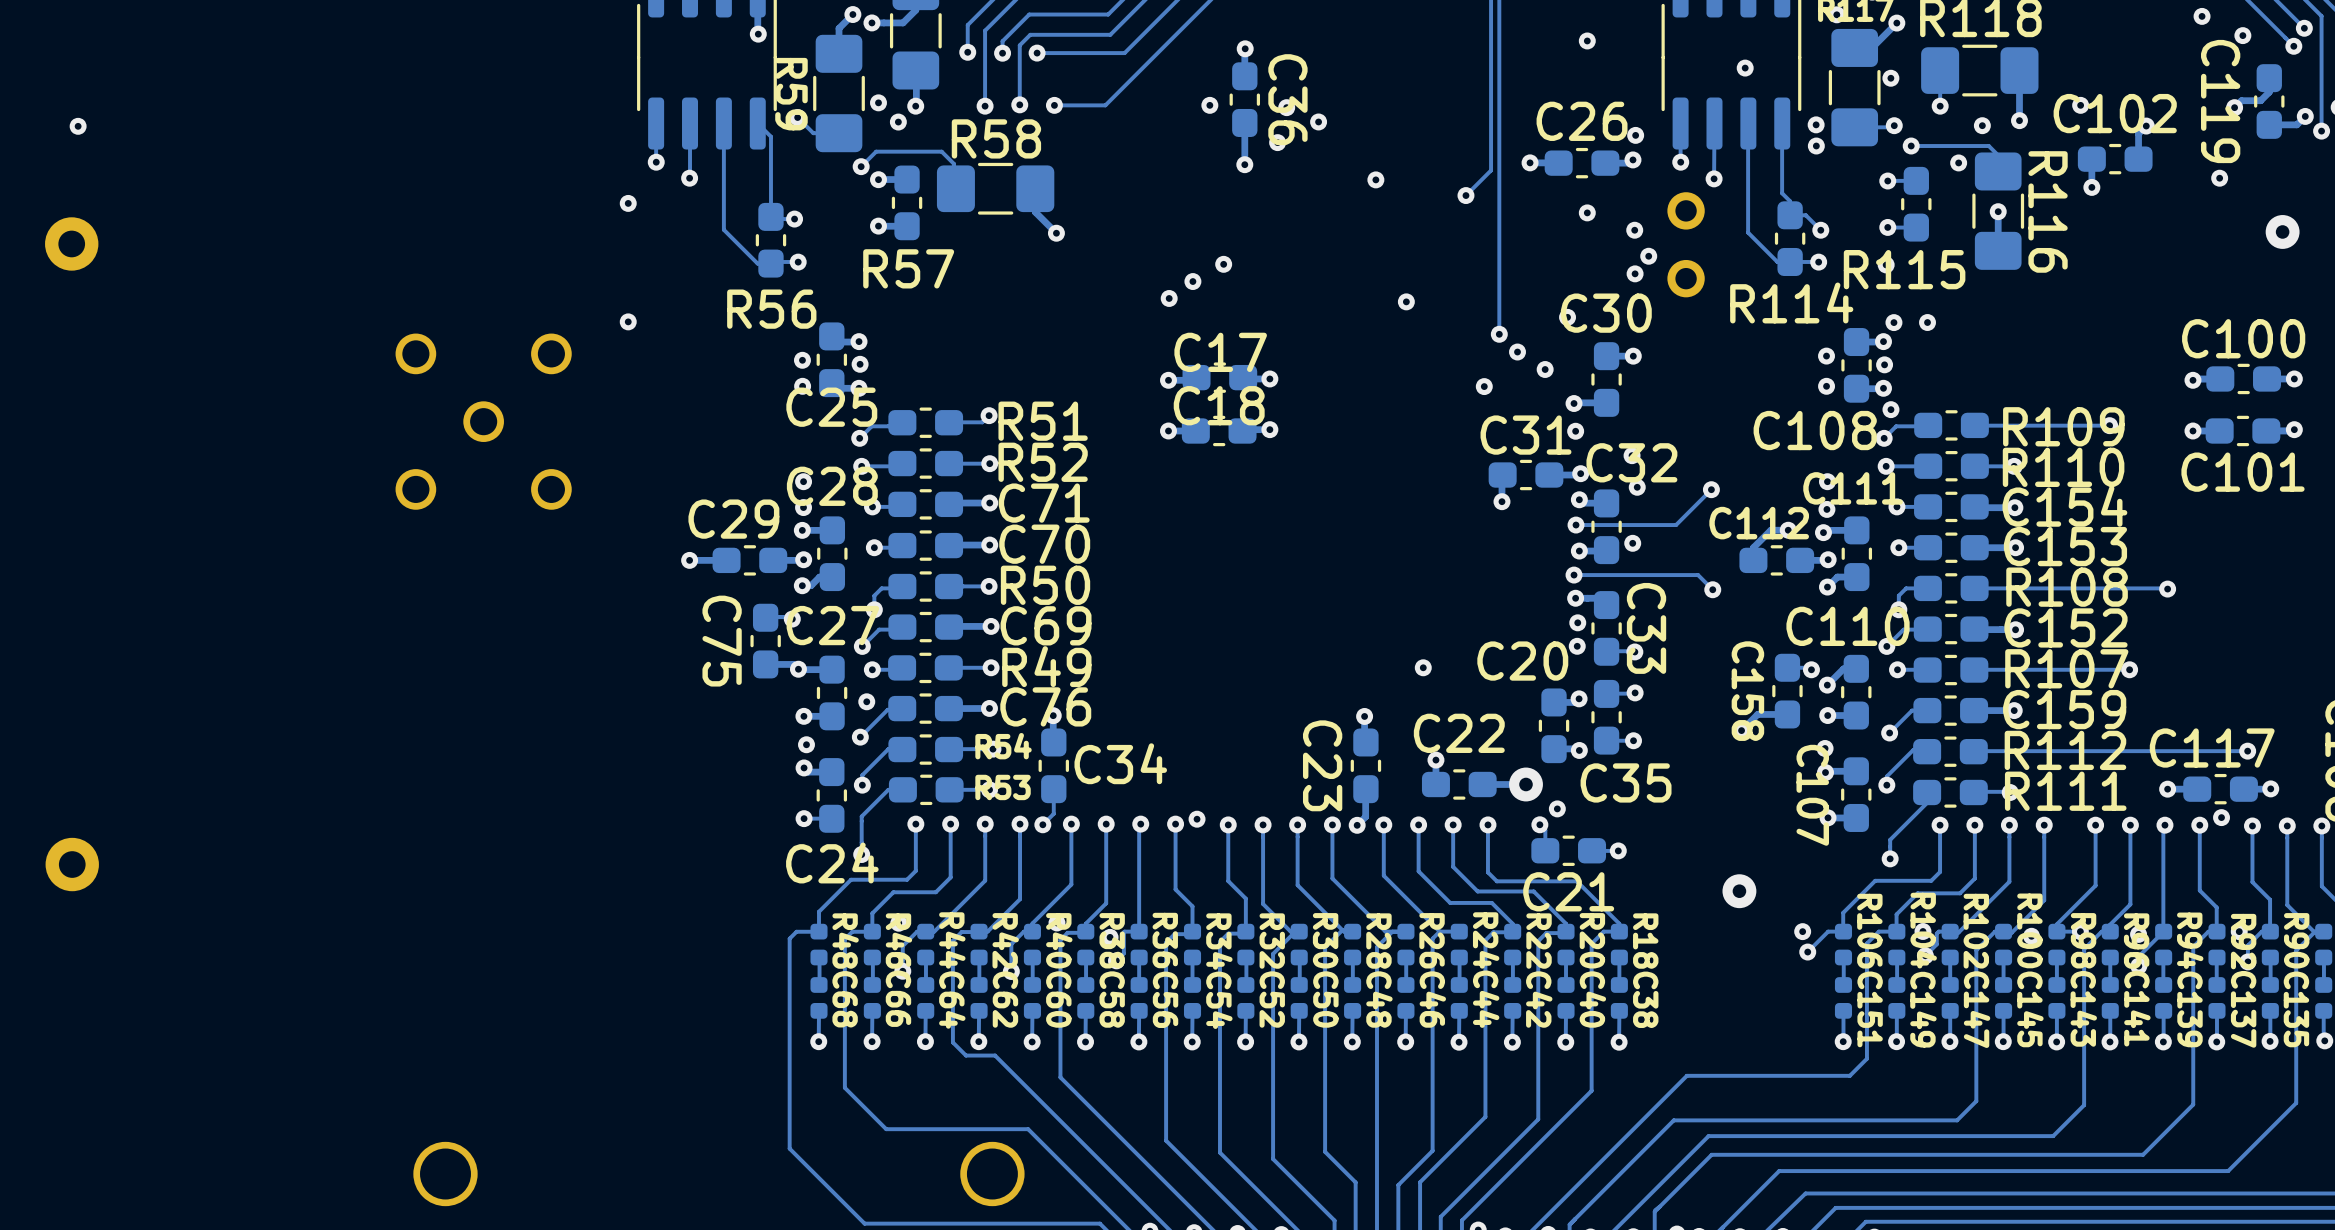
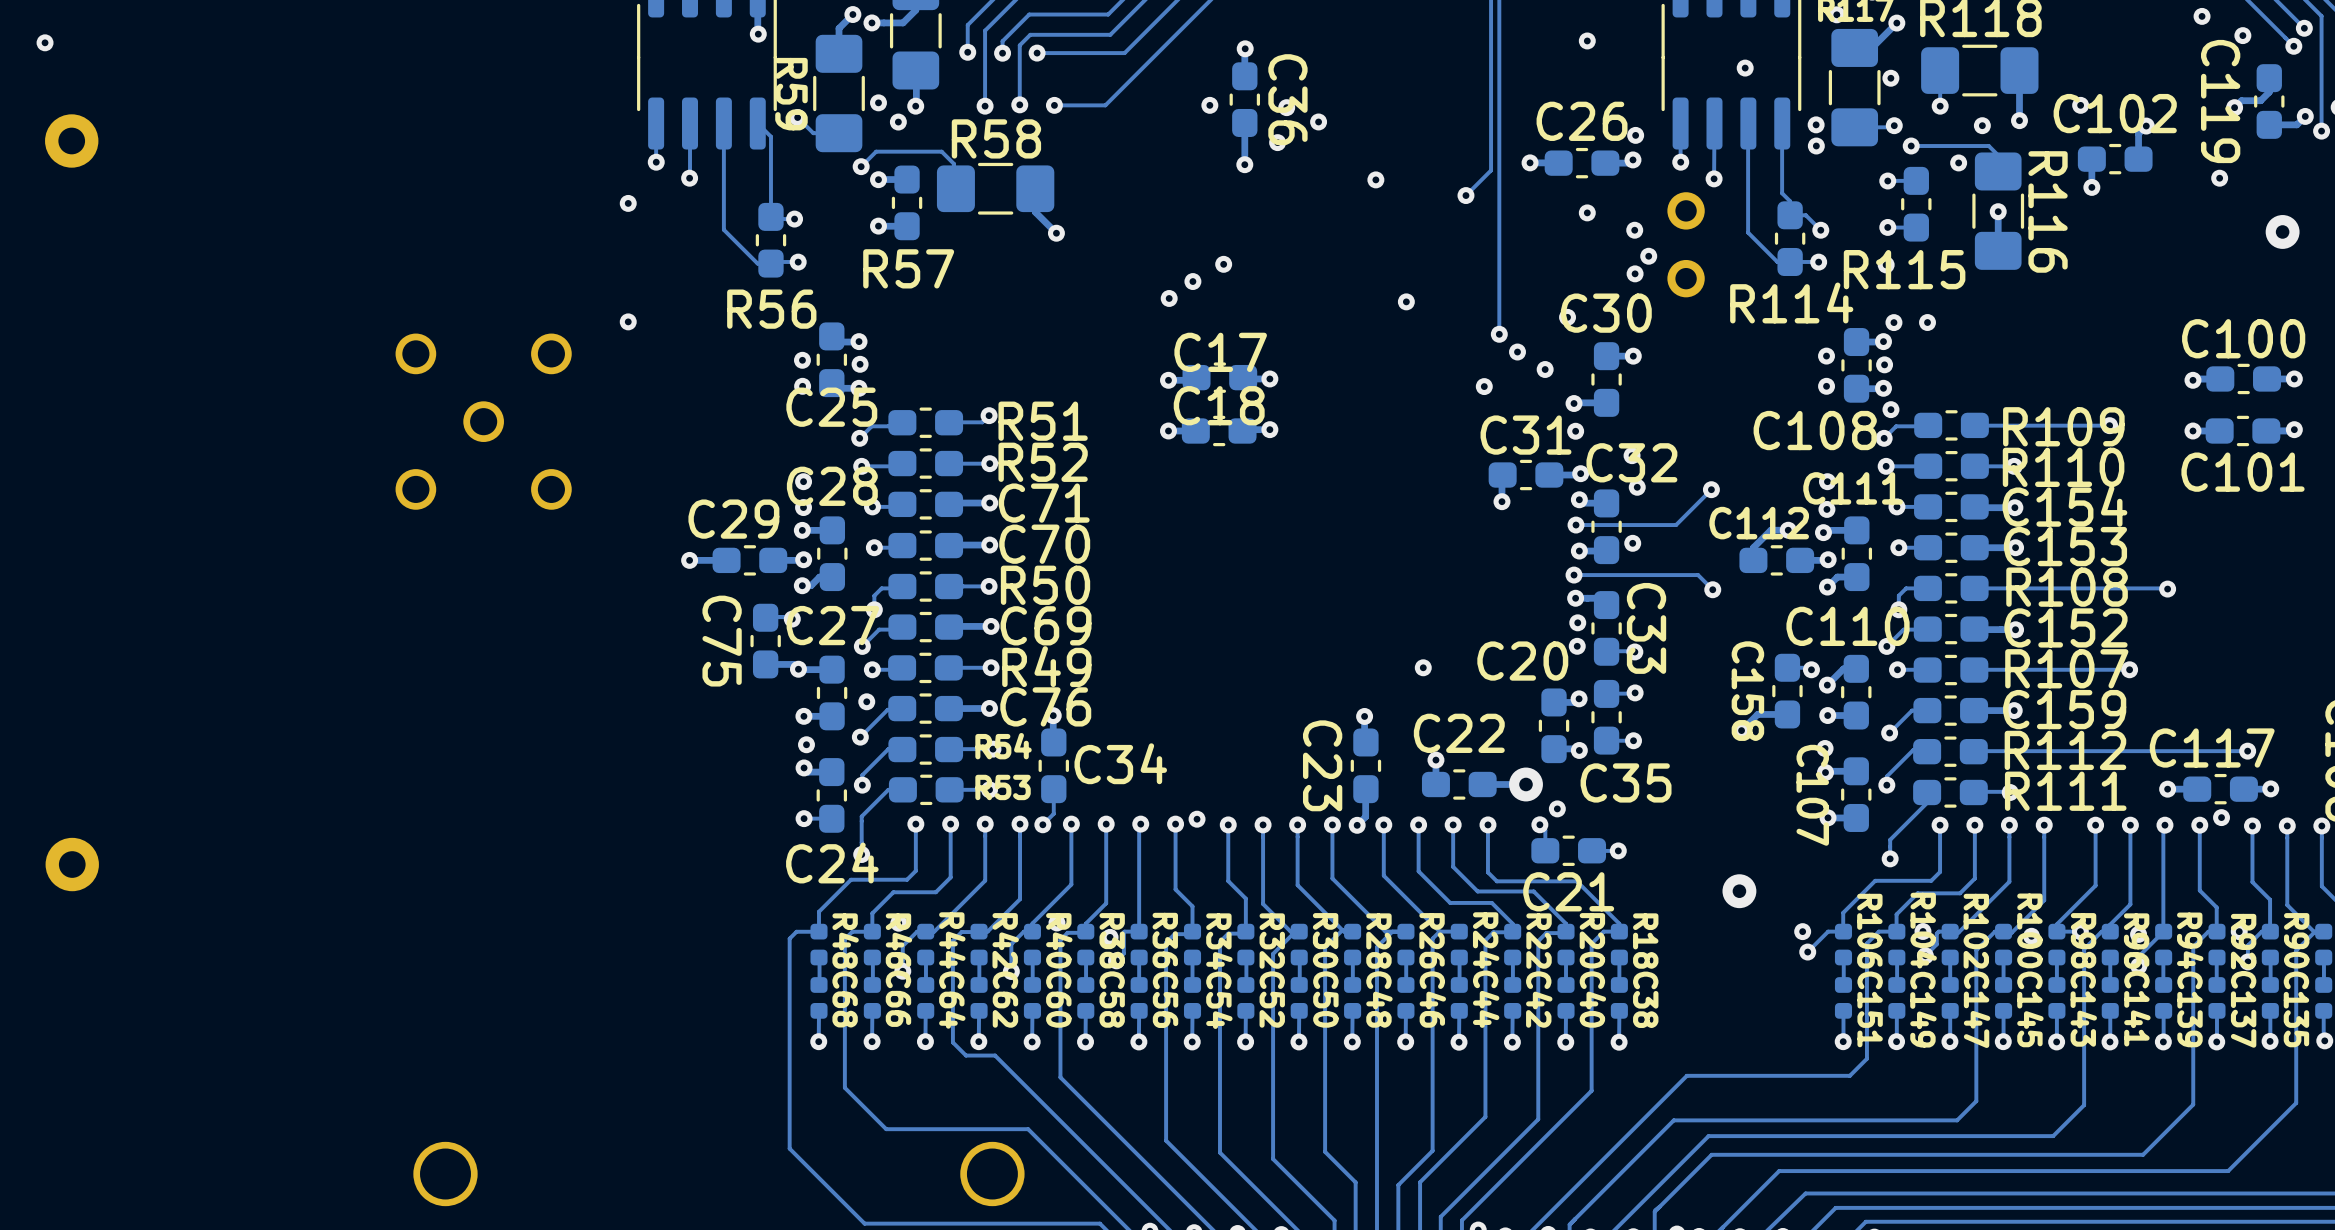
via: none -> (45, 42)
via: (78, 126) -> none
part position: (71, 243) -> (71, 140)

